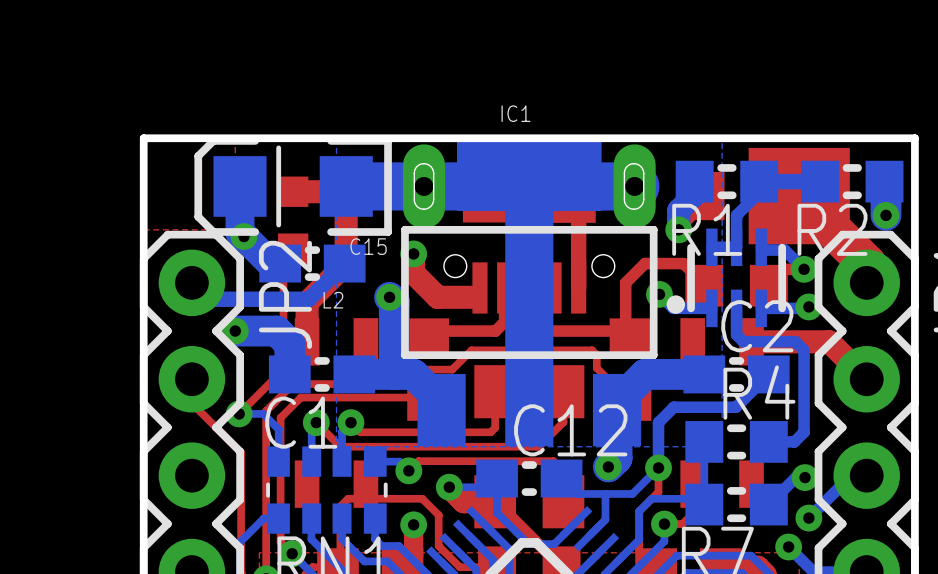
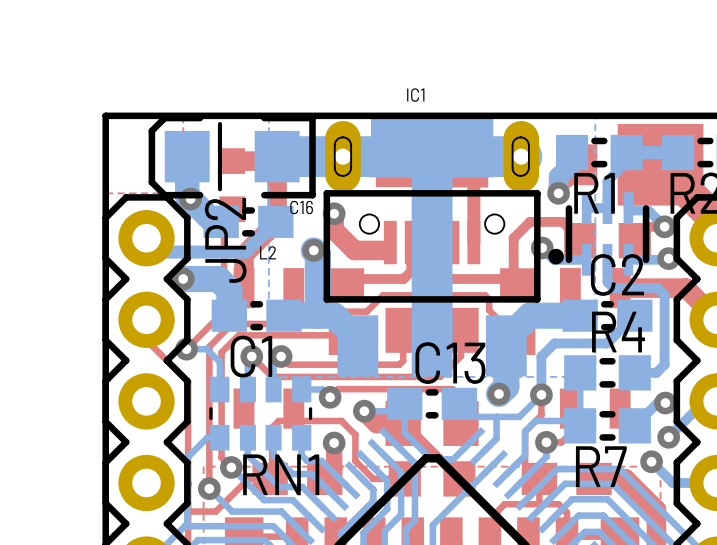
C15 name: C15 (368, 246) -> C16 (301, 207)
C12 name: C12 (570, 430) -> C13 (450, 363)

